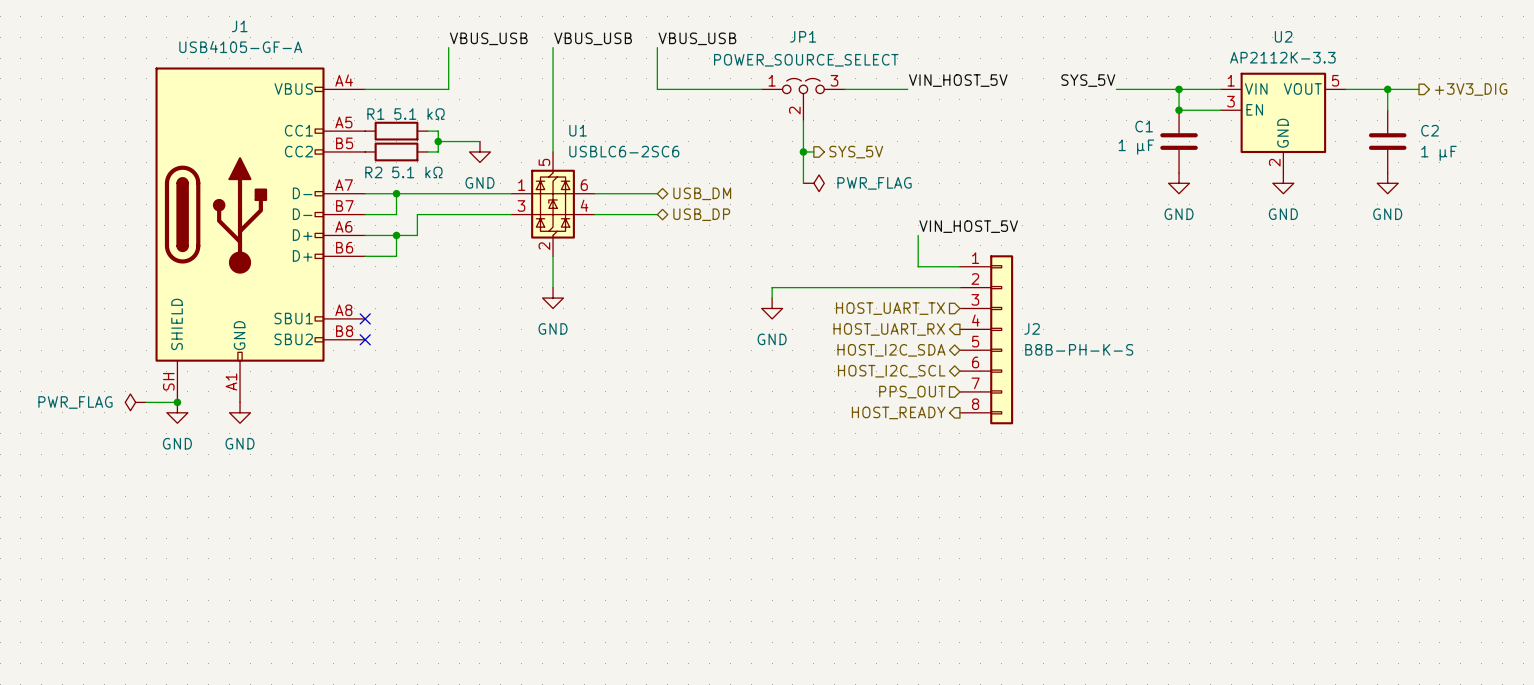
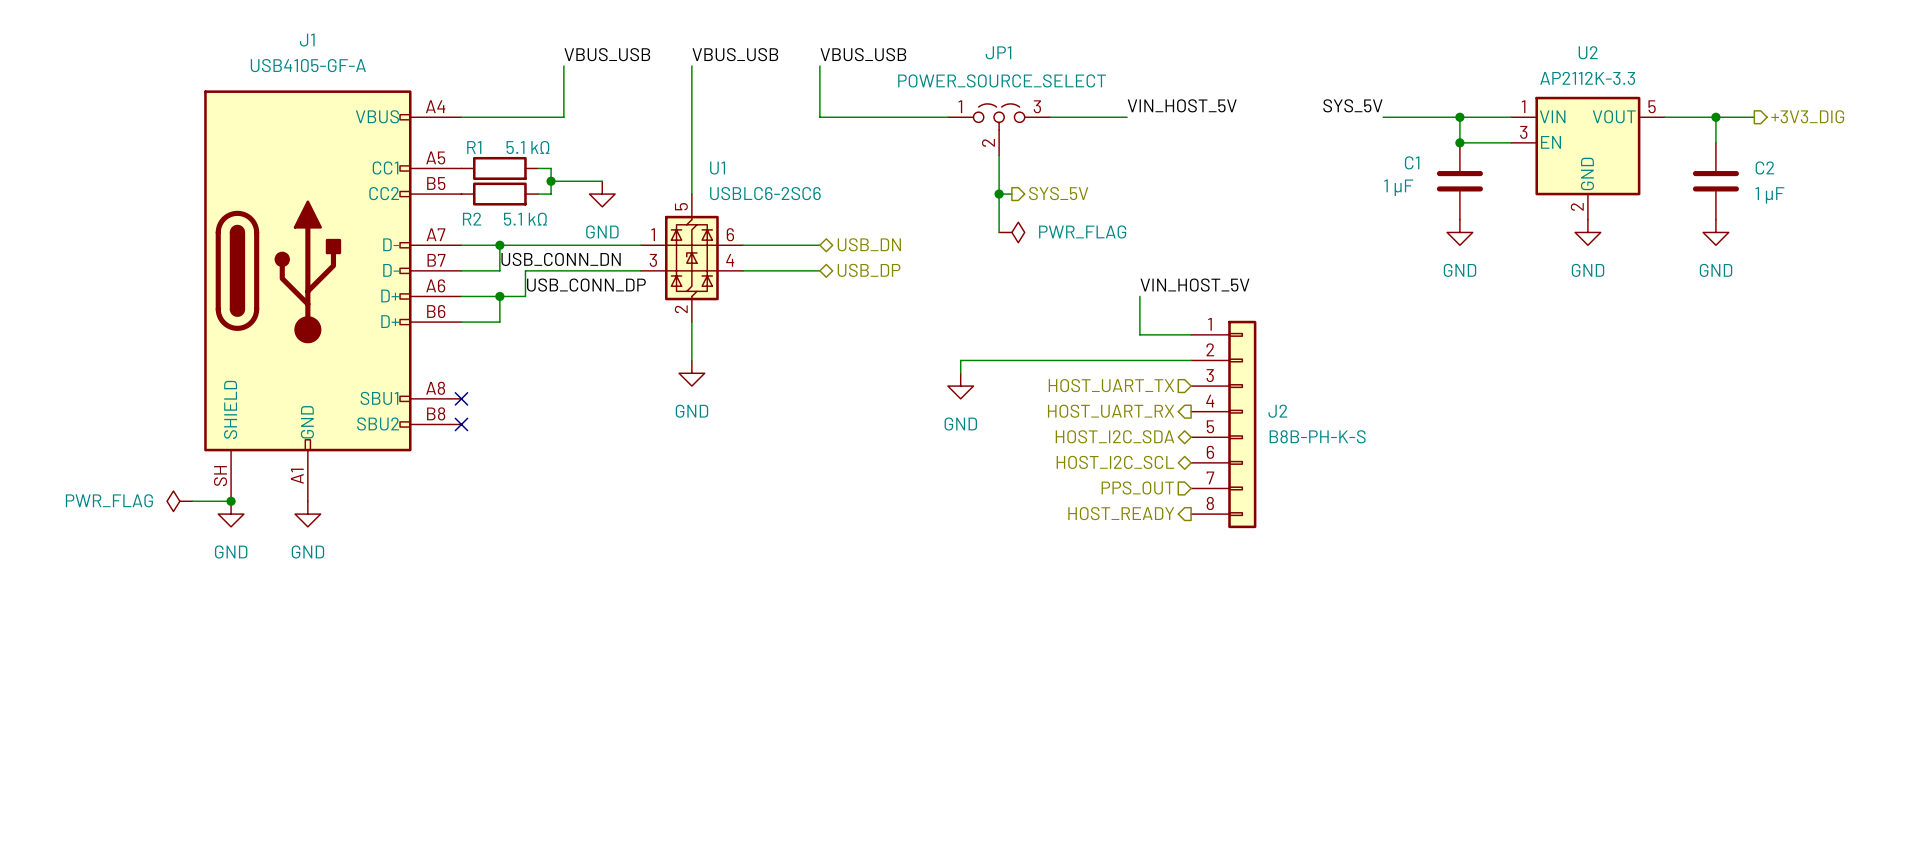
hierarchical label: USB_DM (702, 193) -> USB_DN (869, 244)
label: none -> USB_CONN_DN (561, 259)
label: none -> USB_CONN_DP (586, 285)

